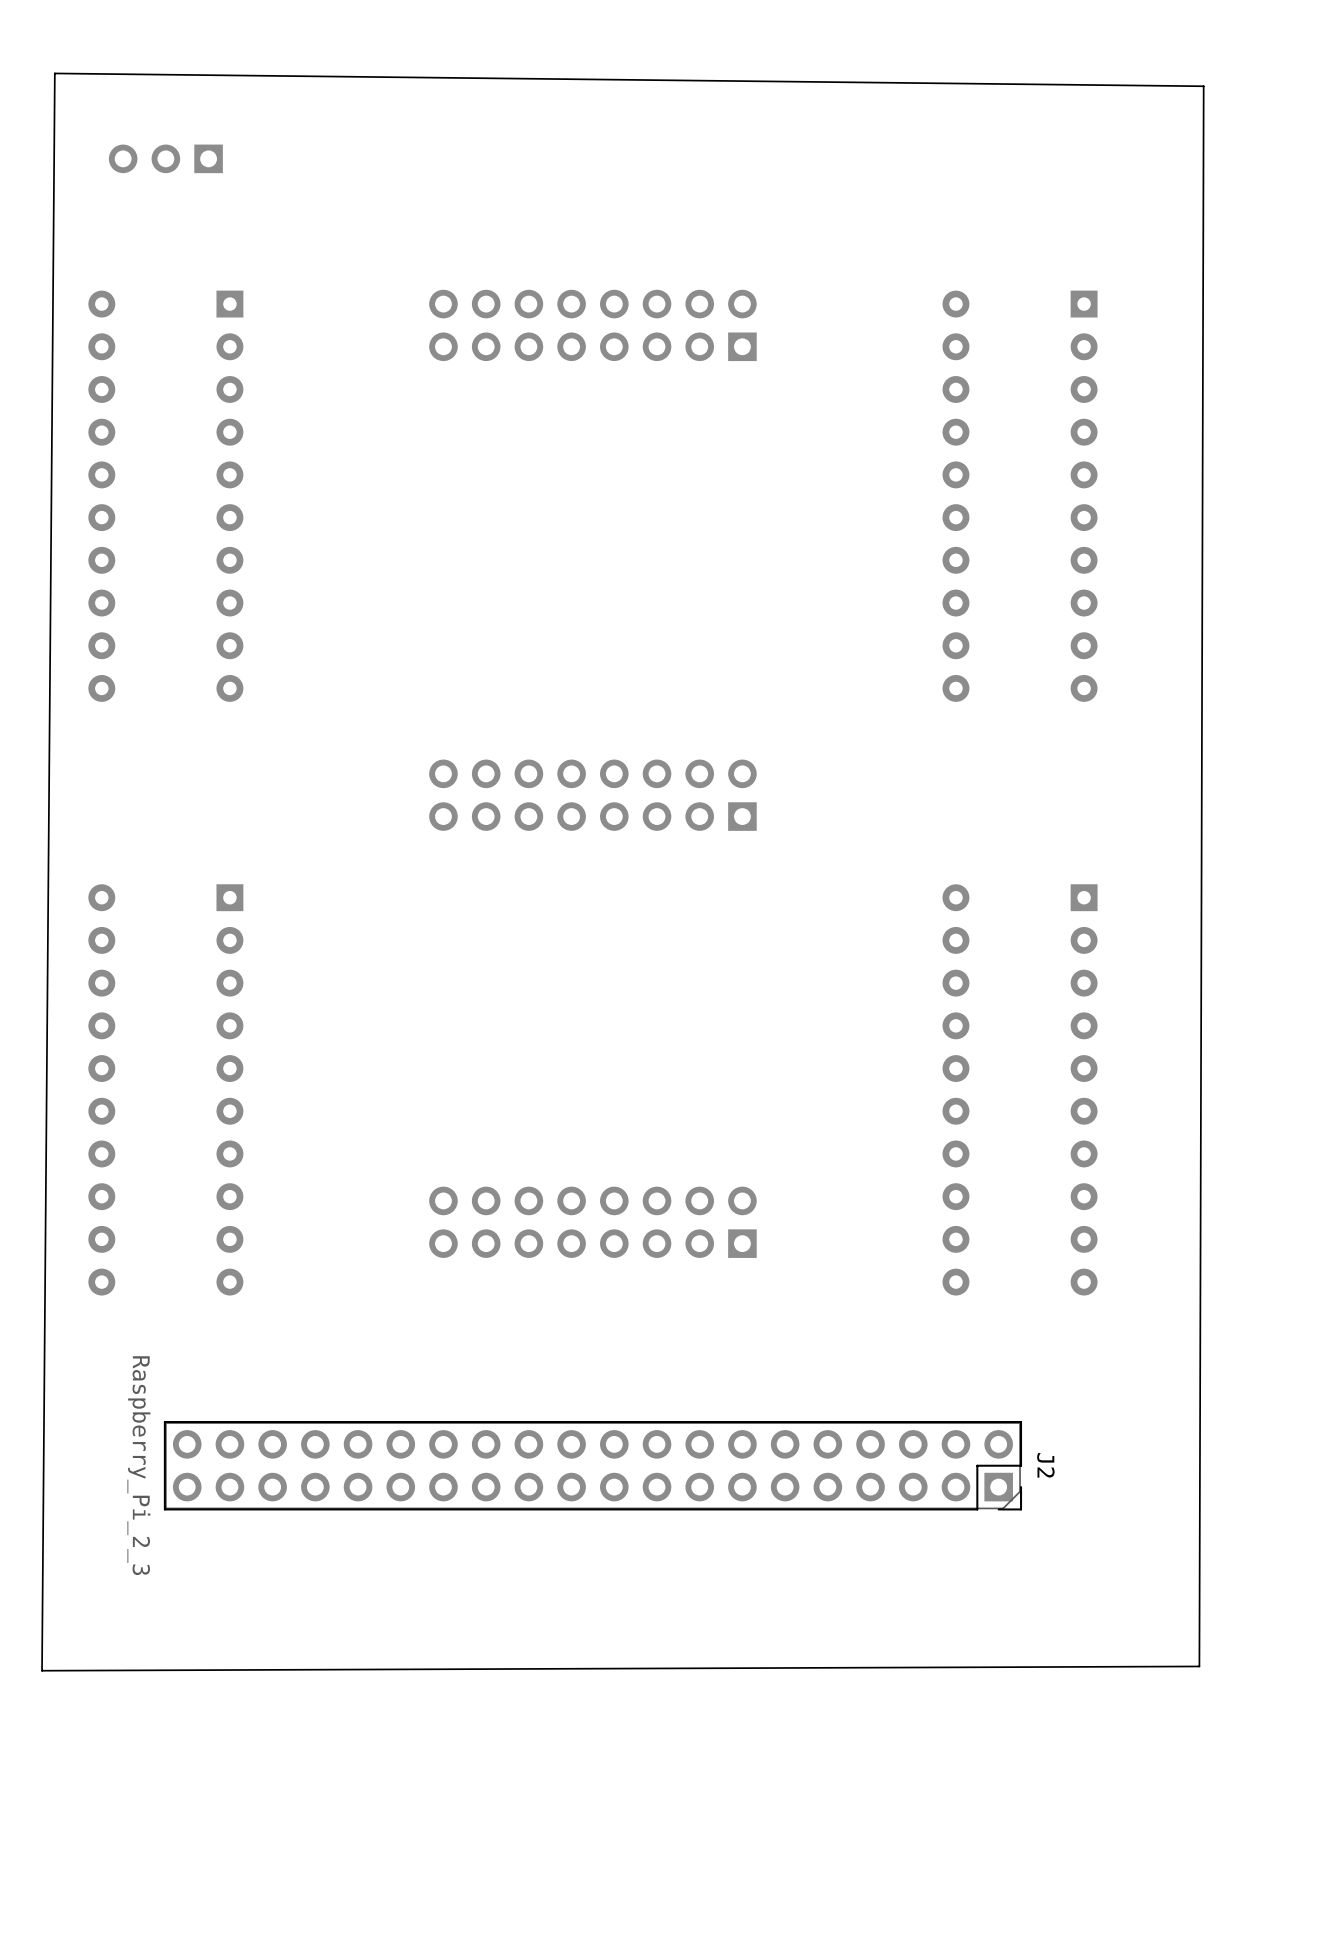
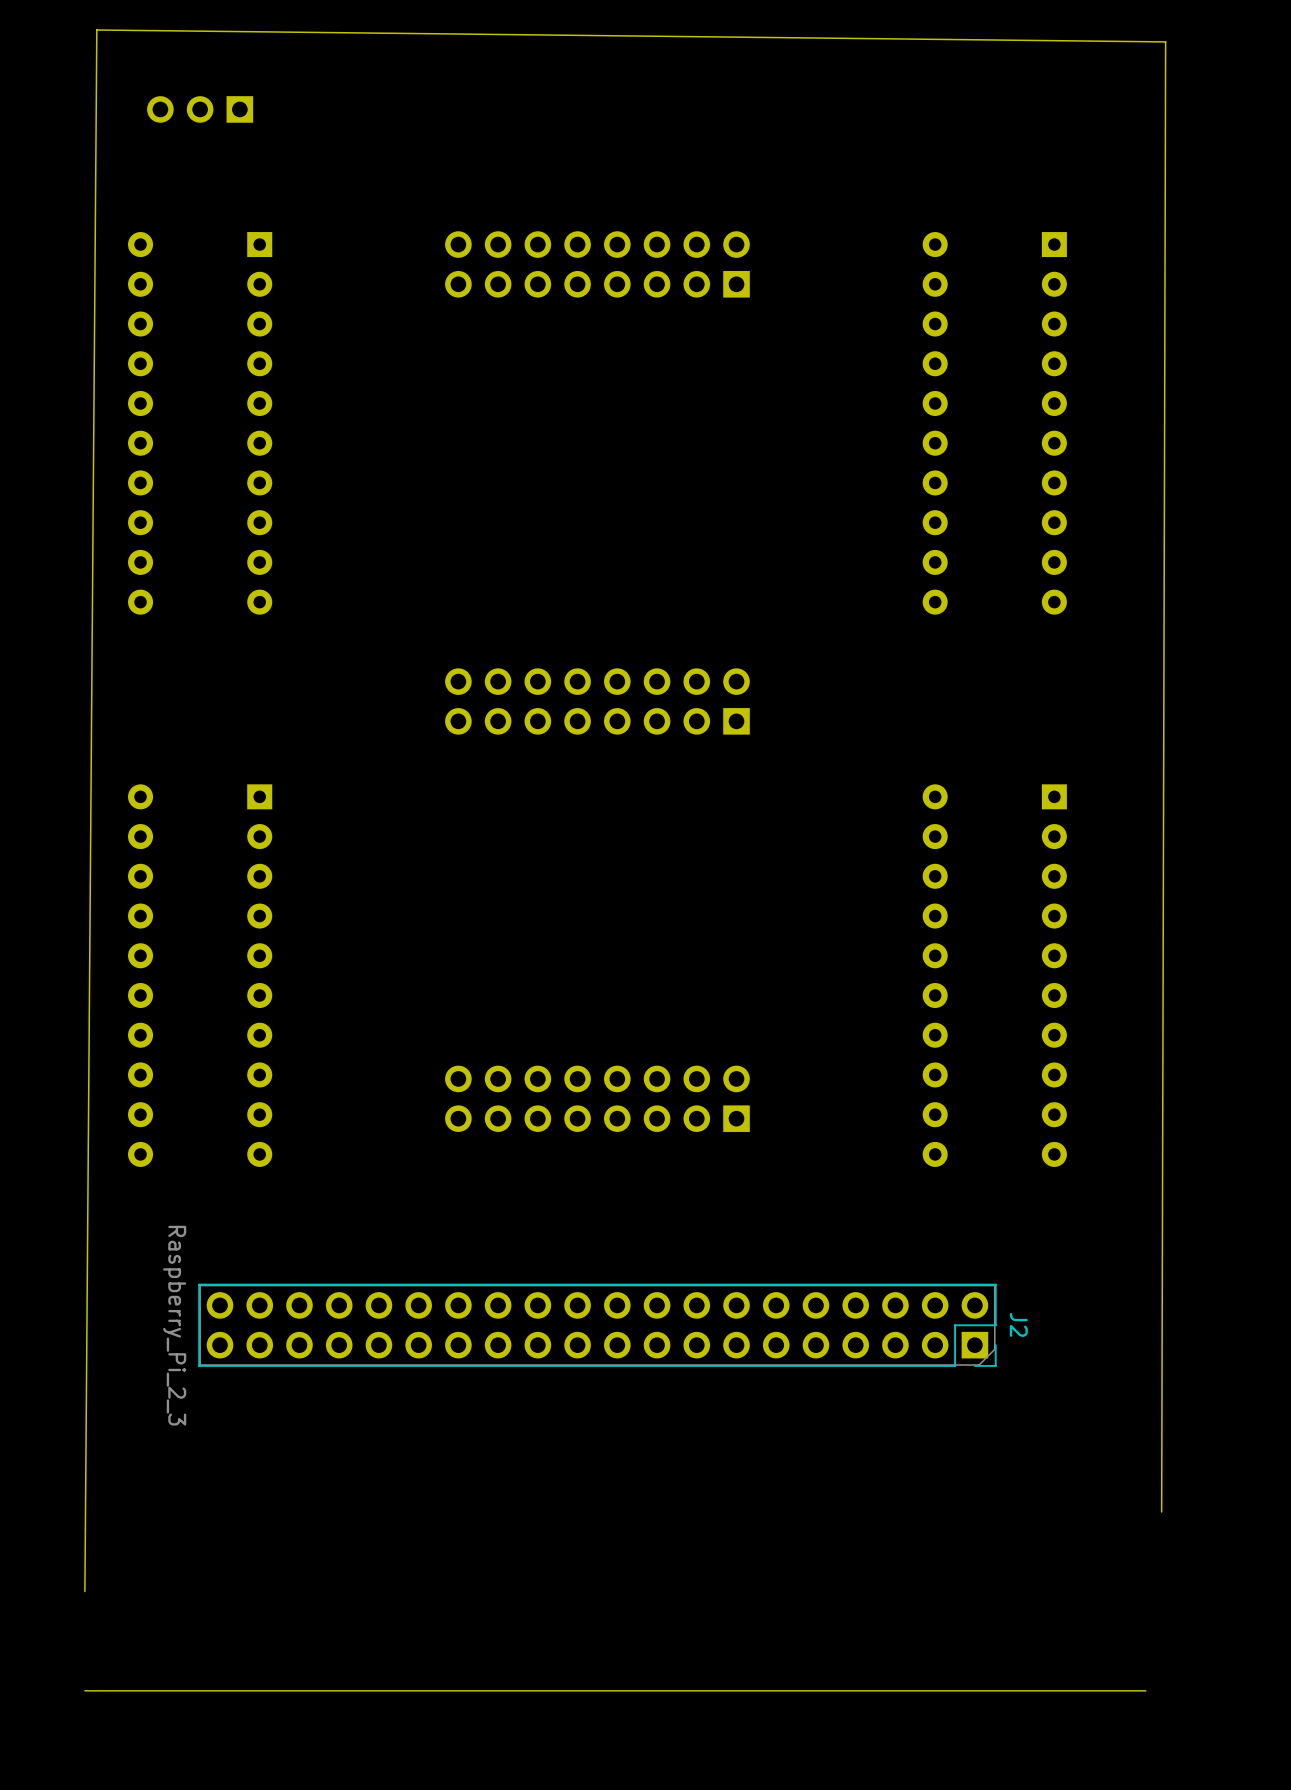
board edge: (54, 73) (42, 1670) (1199, 1666) -> (96, 30) (84, 1591)
board edge: none -> (1145, 1690) (84, 1690)

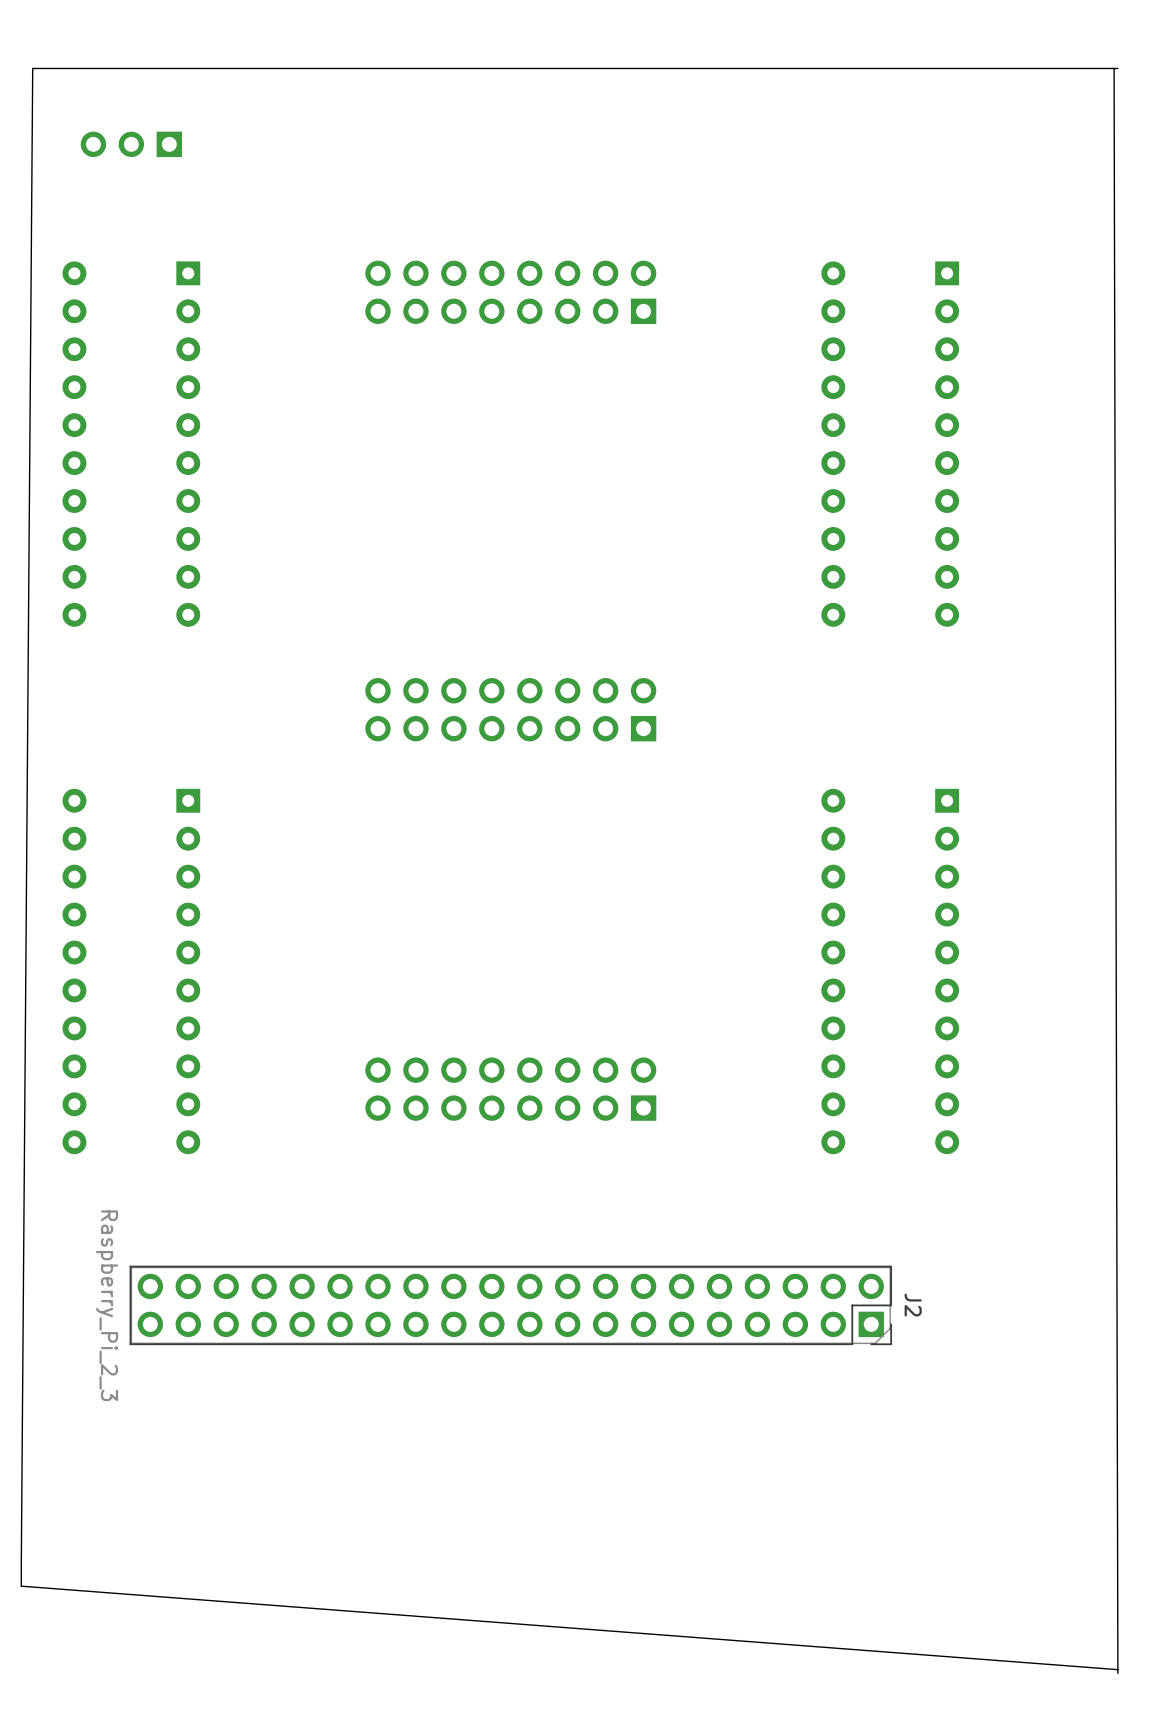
board edge: (96, 30) (1165, 41) (1161, 1512) -> (32, 68) (1117, 68)
board edge: none -> (1114, 68) (1117, 1673)
board edge: none -> (21, 1559) (21, 1586) (1117, 1669)
board edge: (1145, 1690) (84, 1690) -> none

